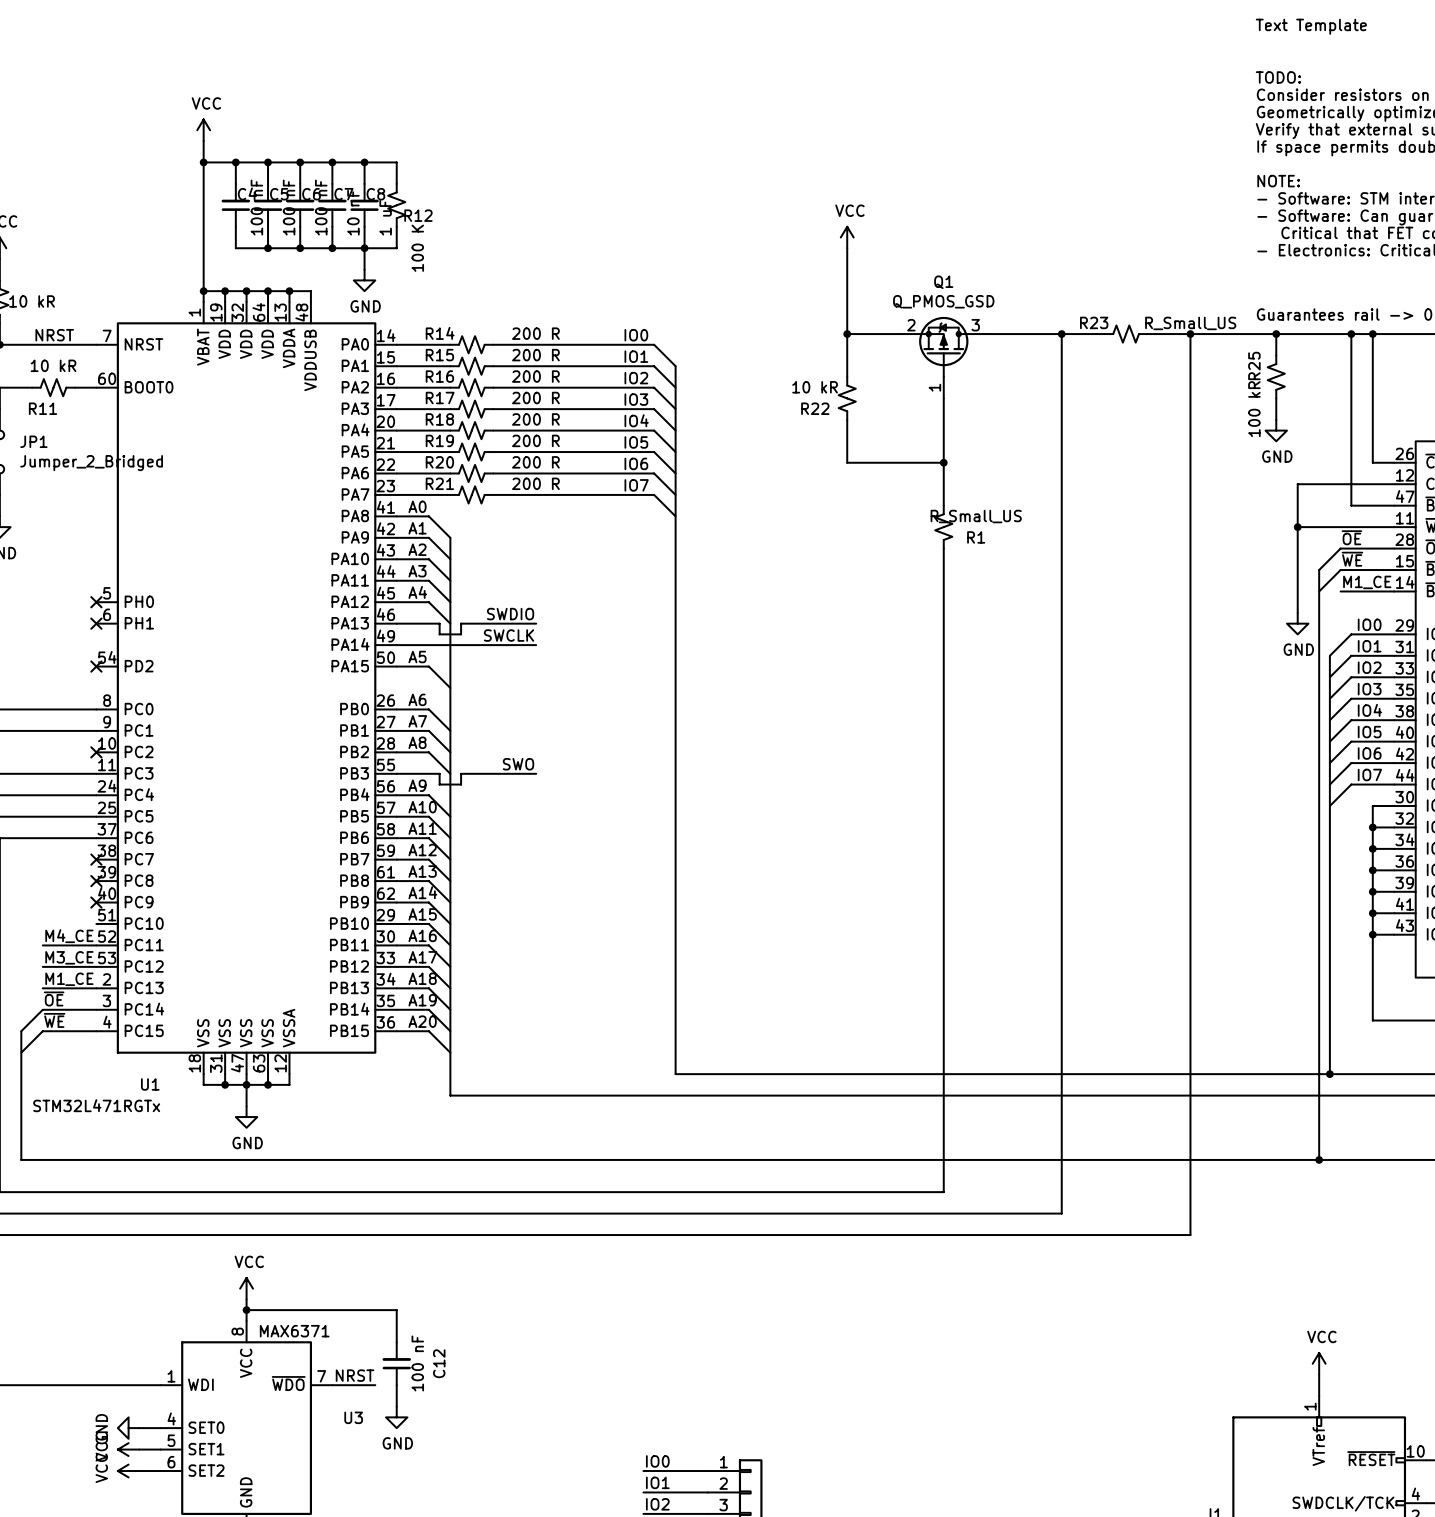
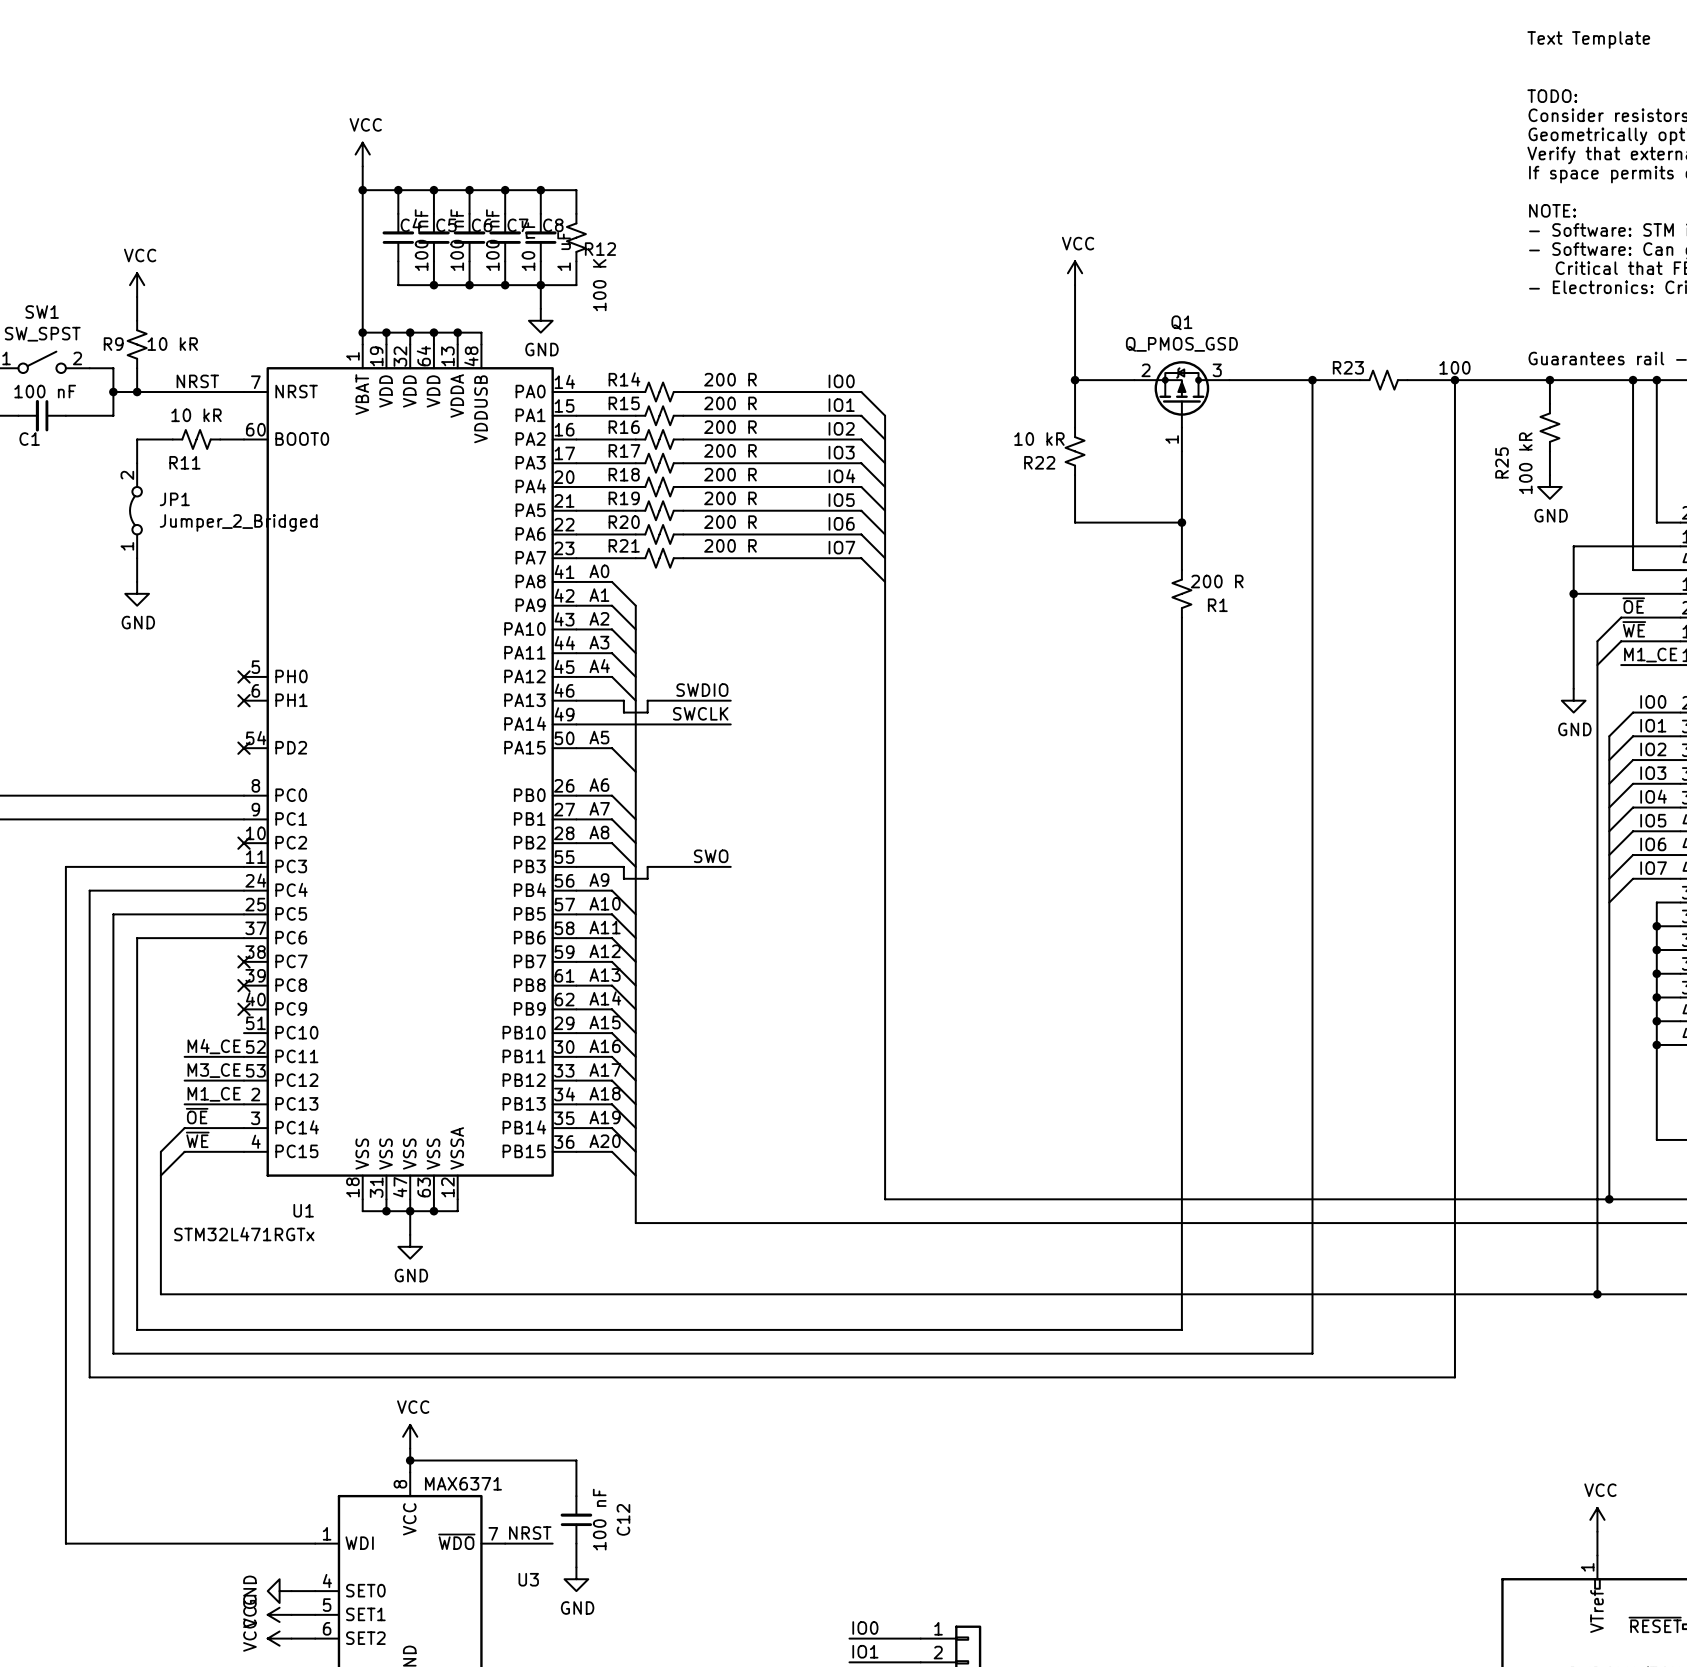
R23 value: R_Small_US (1190, 323) -> 100 (1454, 367)
R25 name position: R25 (1254, 365) -> R25 (1502, 462)
R1 value: R_Small_US (976, 516) -> 200 R (1217, 581)

